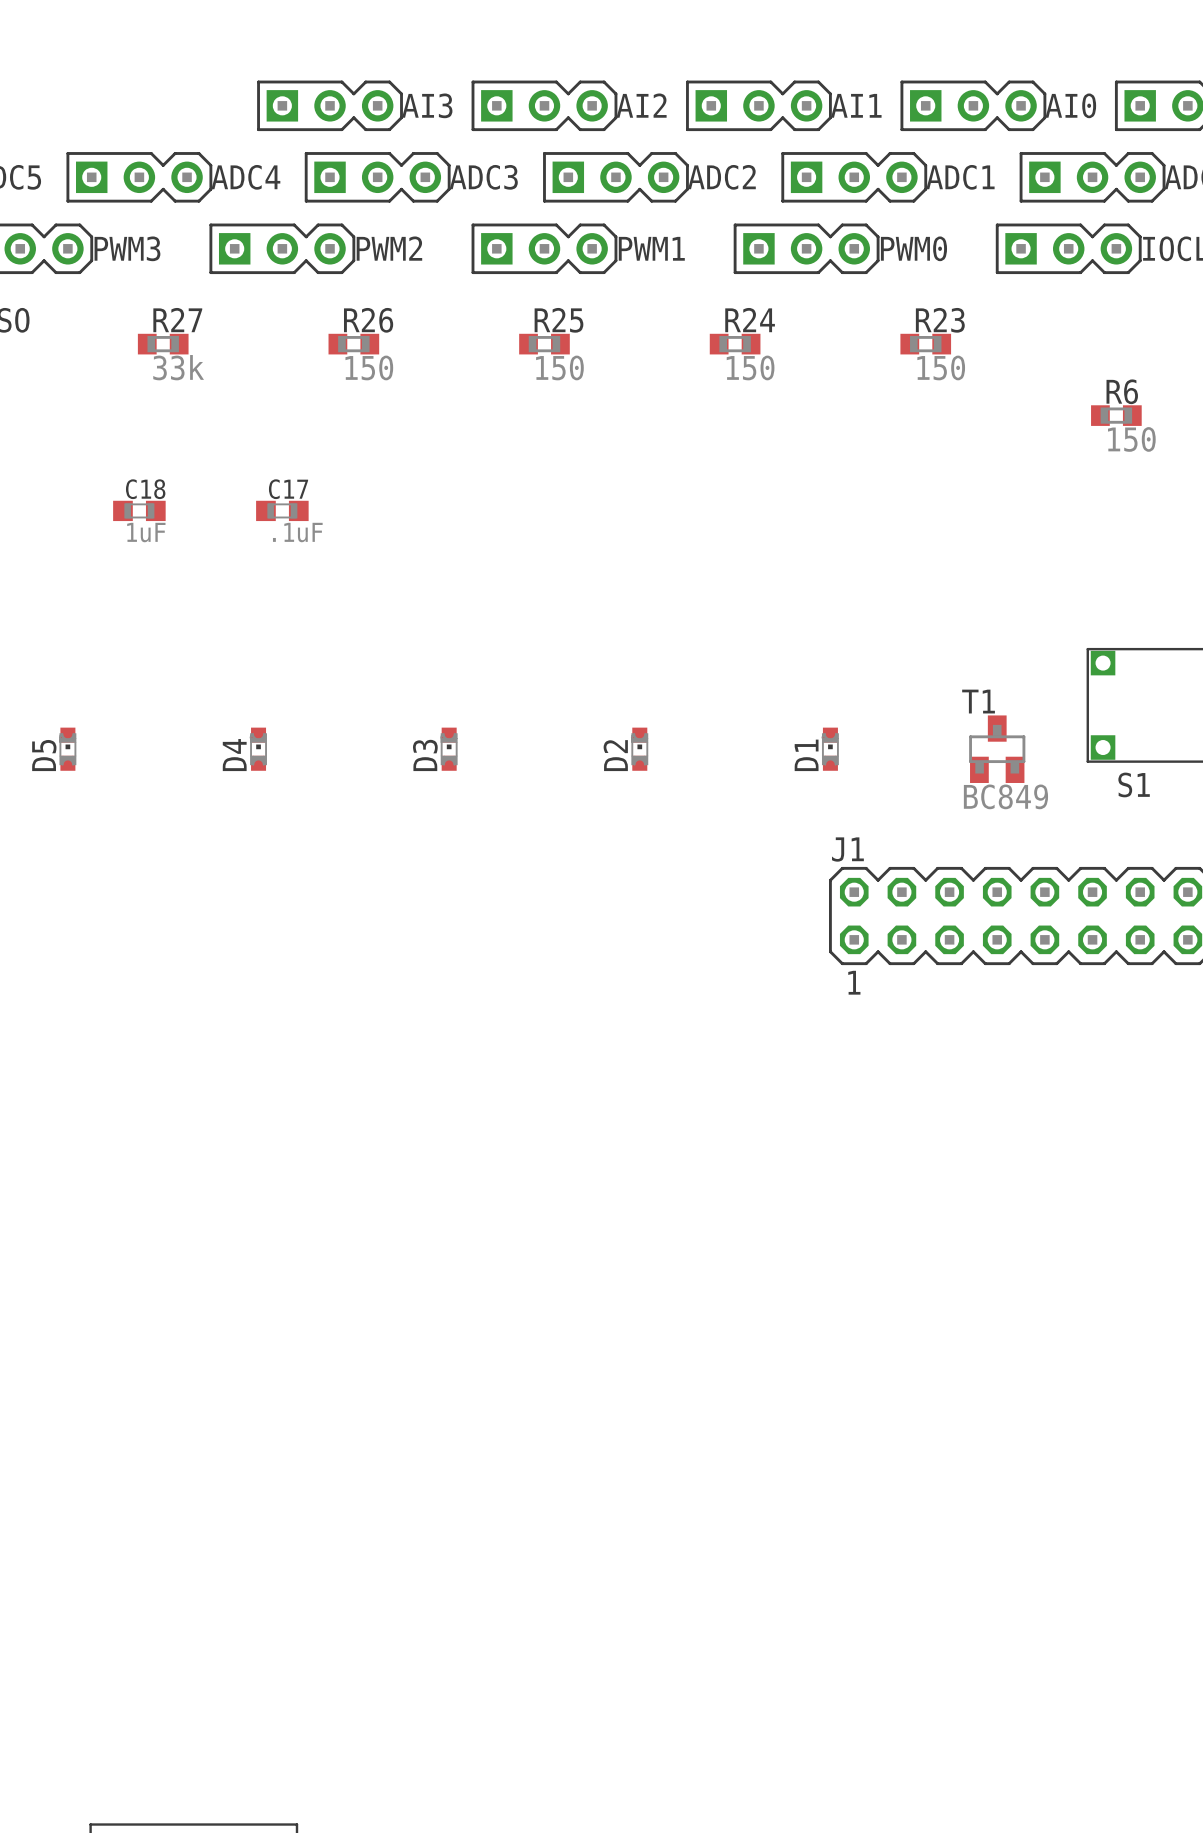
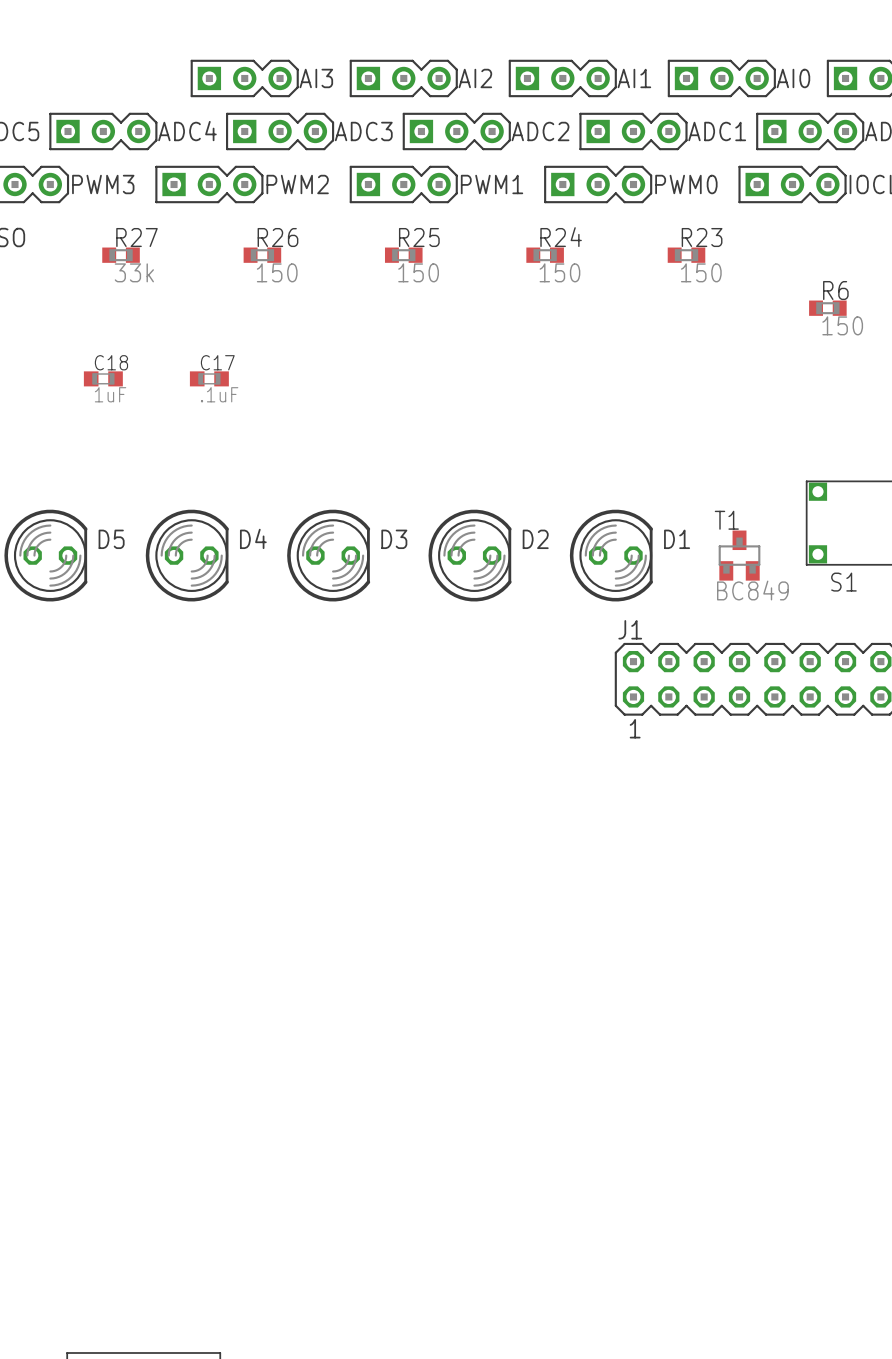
D5 footprint: [59, 727, 77, 771] -> [4, 509, 88, 602]
D4 footprint: [250, 727, 267, 771] -> [145, 509, 229, 602]
D3 footprint: [440, 727, 458, 771] -> [287, 509, 371, 602]
D2 footprint: [631, 727, 649, 771] -> [428, 509, 512, 602]
D1 footprint: [821, 727, 839, 771] -> [569, 509, 653, 602]
D5 name position: D5 (44, 755) -> D5 (111, 539)
D4 name position: D4 (234, 755) -> D4 (253, 538)
D3 name position: D3 (425, 755) -> D3 (394, 539)
D2 name position: D2 (615, 755) -> D2 (535, 539)
D1 name position: D1 (806, 755) -> D1 (677, 539)

